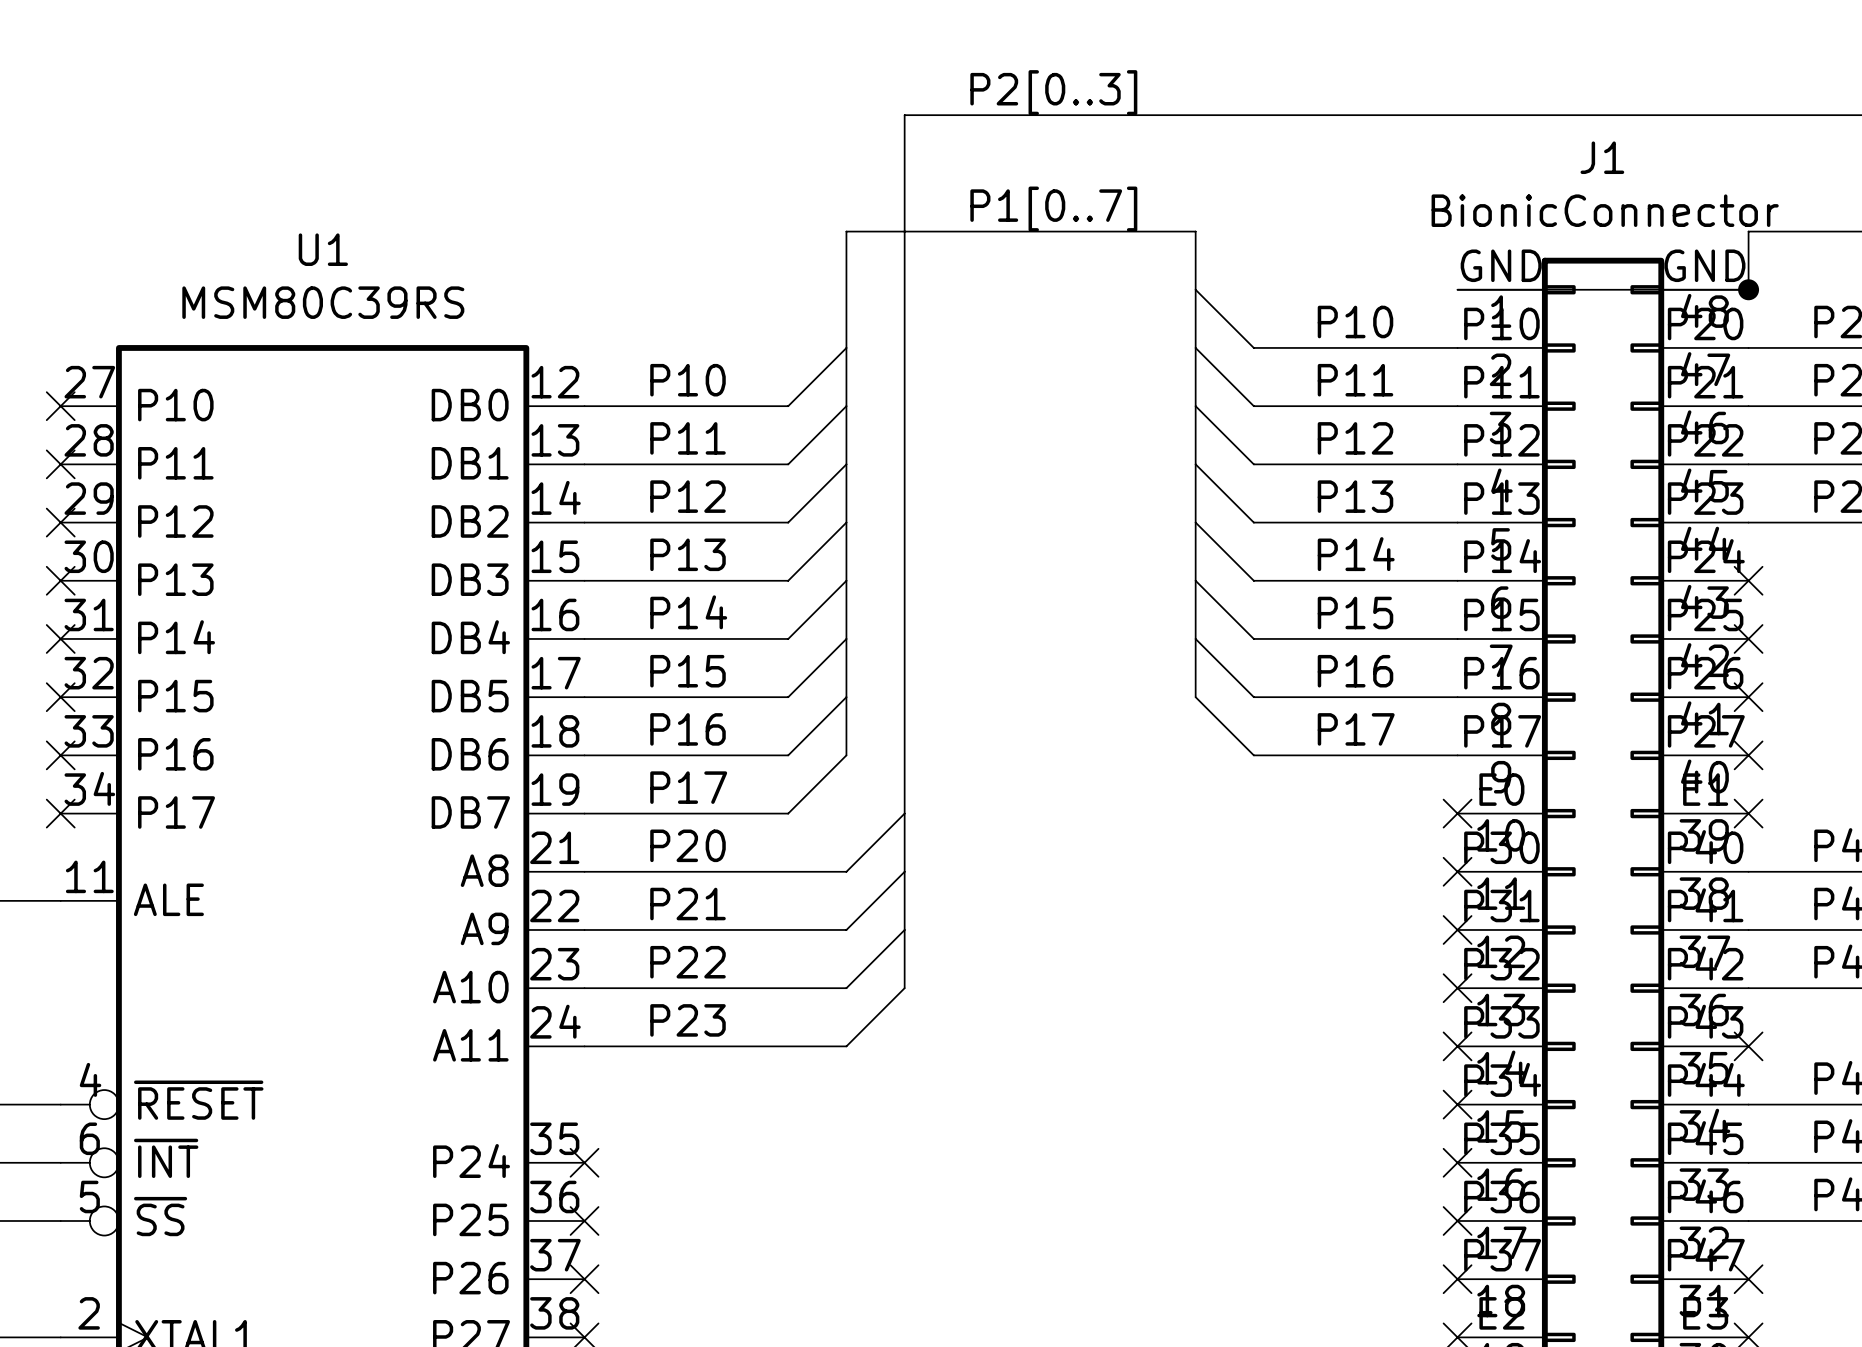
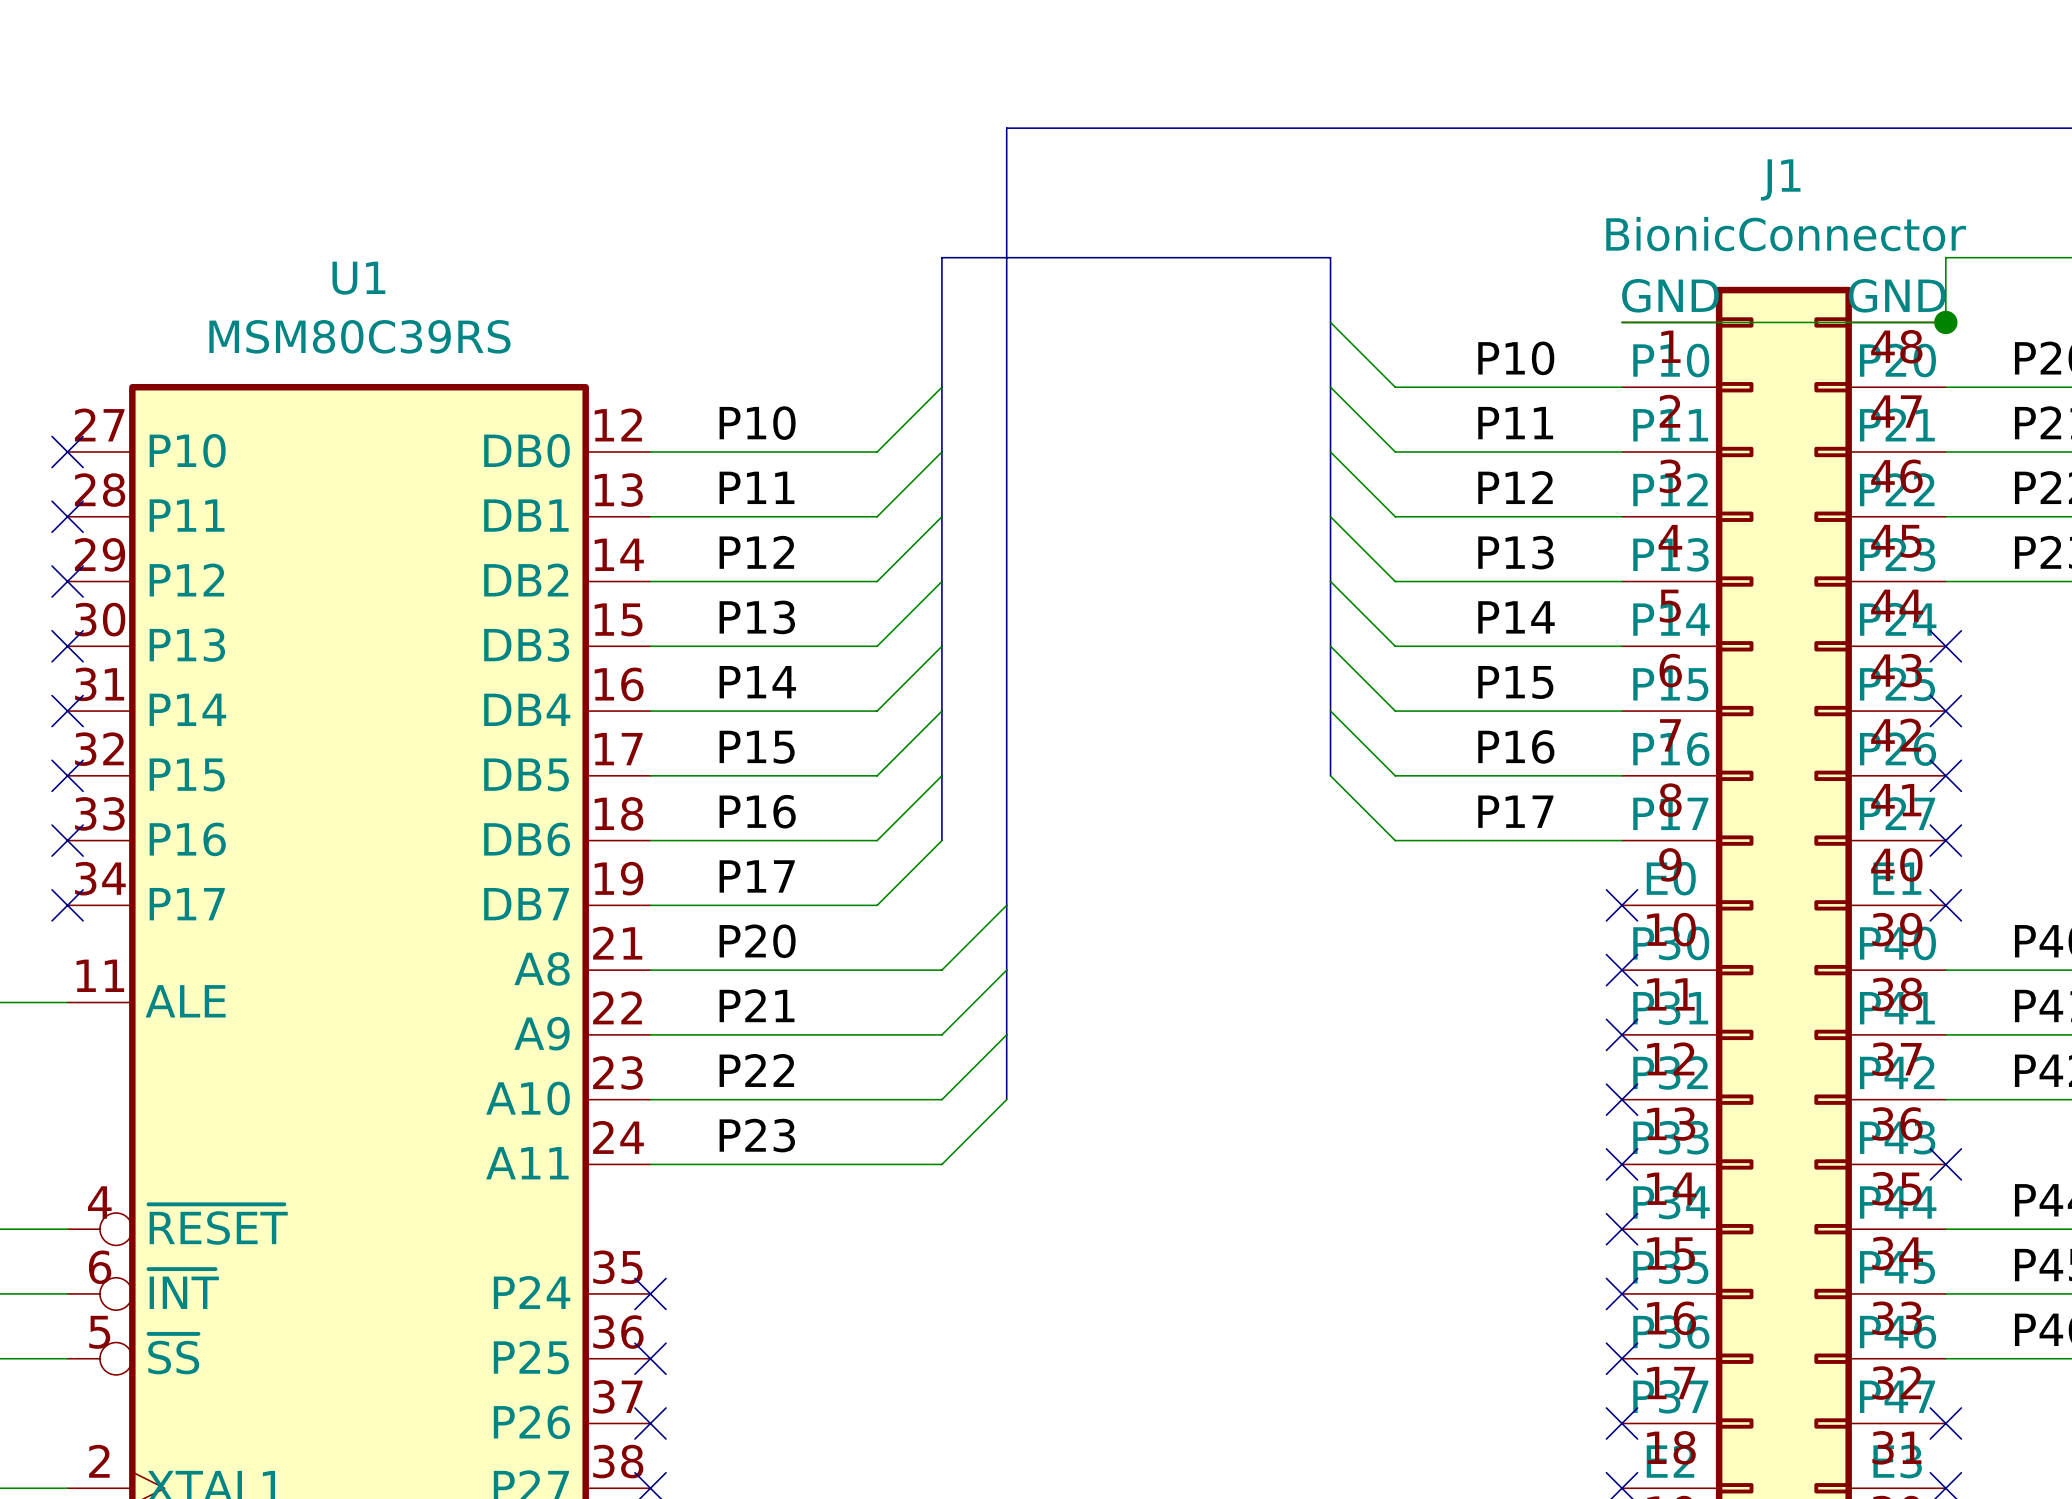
label: P2[0..3] (1053, 92) -> none
label: P1[0..7] (1053, 209) -> none

